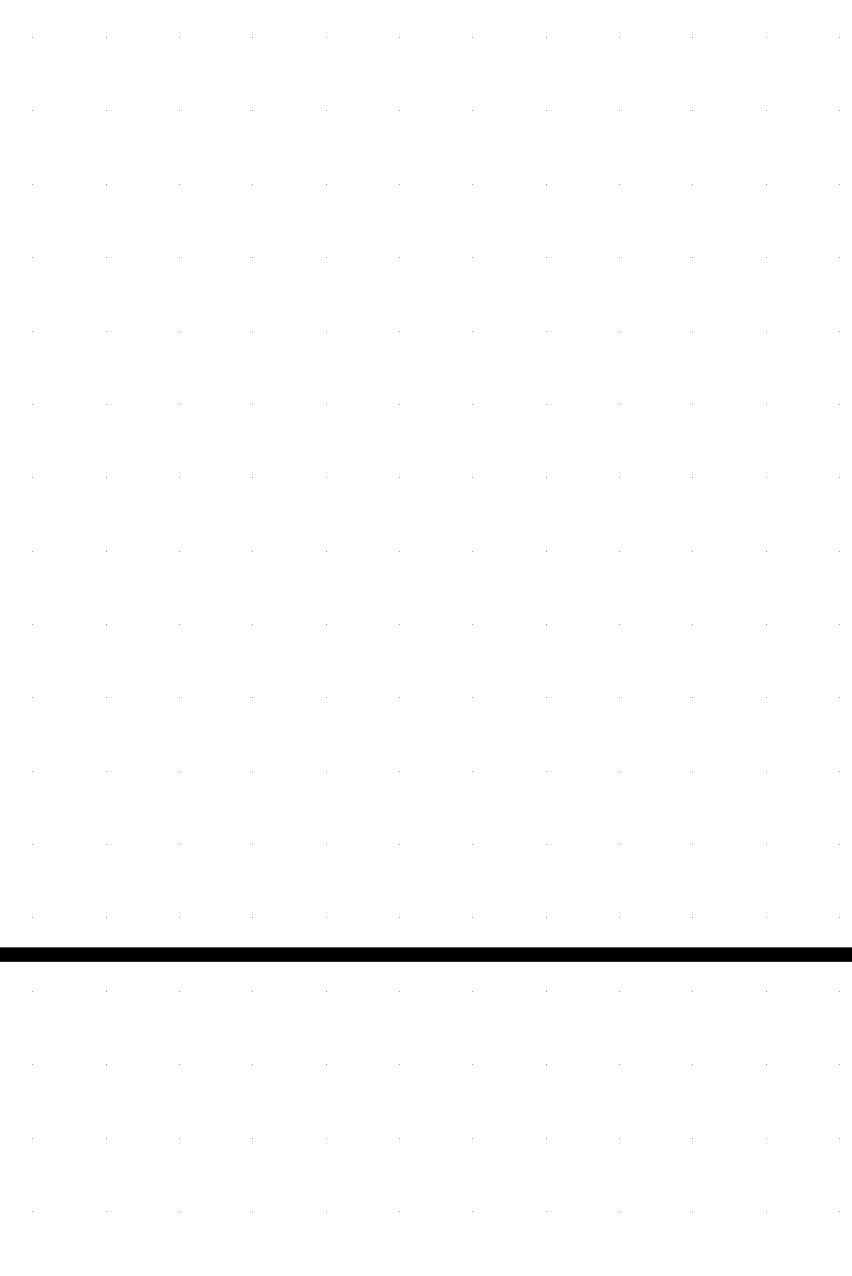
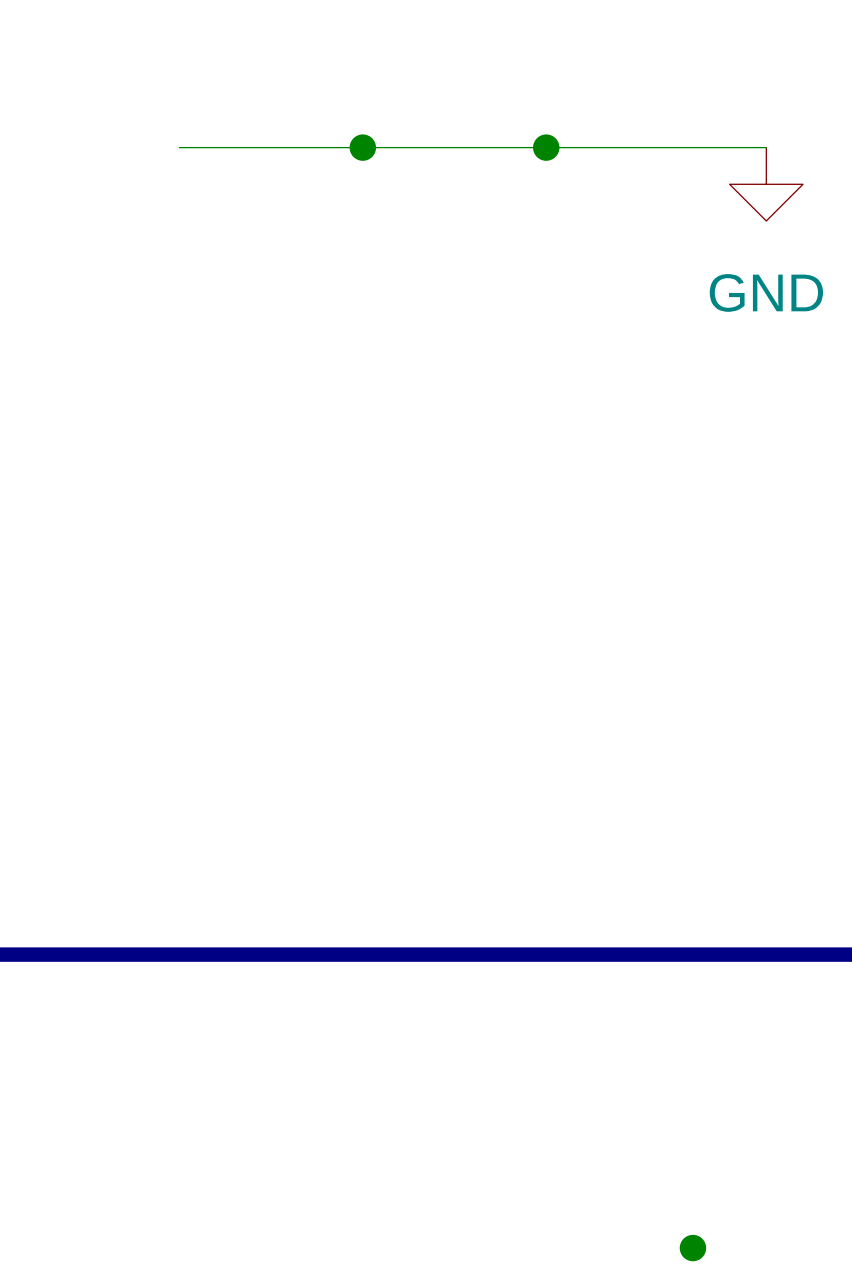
wire: none -> (179, 147) (766, 147)
junction: none -> (362, 147)
junction: none -> (546, 147)
power symbol: none -> GND (766, 184)
junction: none -> (692, 1248)

